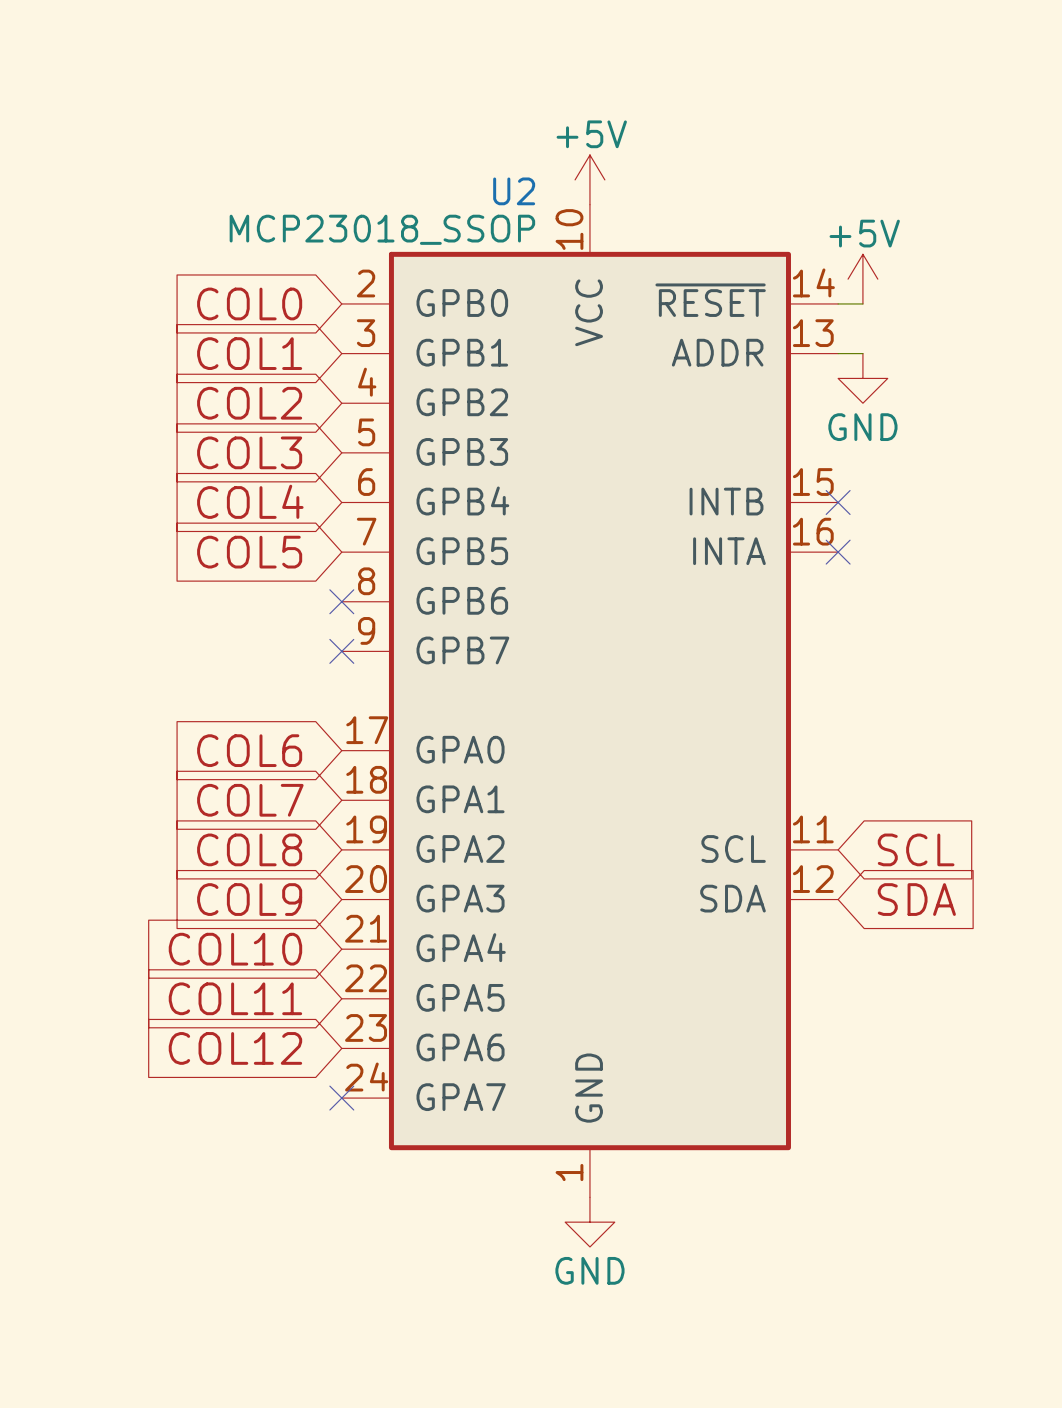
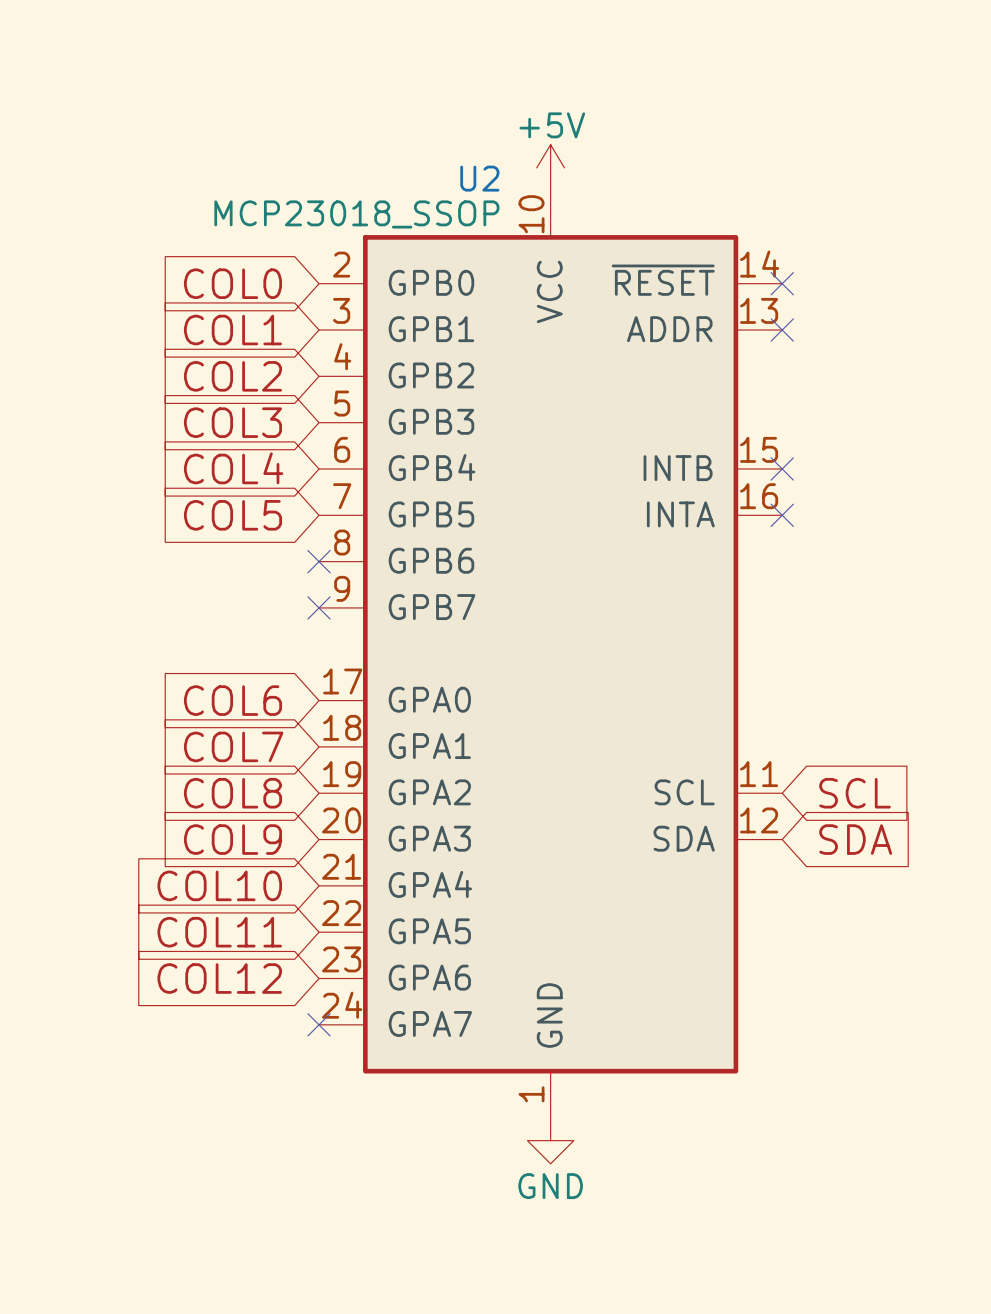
power symbol: +5V (862, 279) -> none
wire: (838, 303) (862, 303) -> none
no-connect mark: none -> (782, 283)
wire: (838, 353) (862, 353) -> none
no-connect mark: none -> (782, 330)
power symbol: GND (862, 378) -> none

